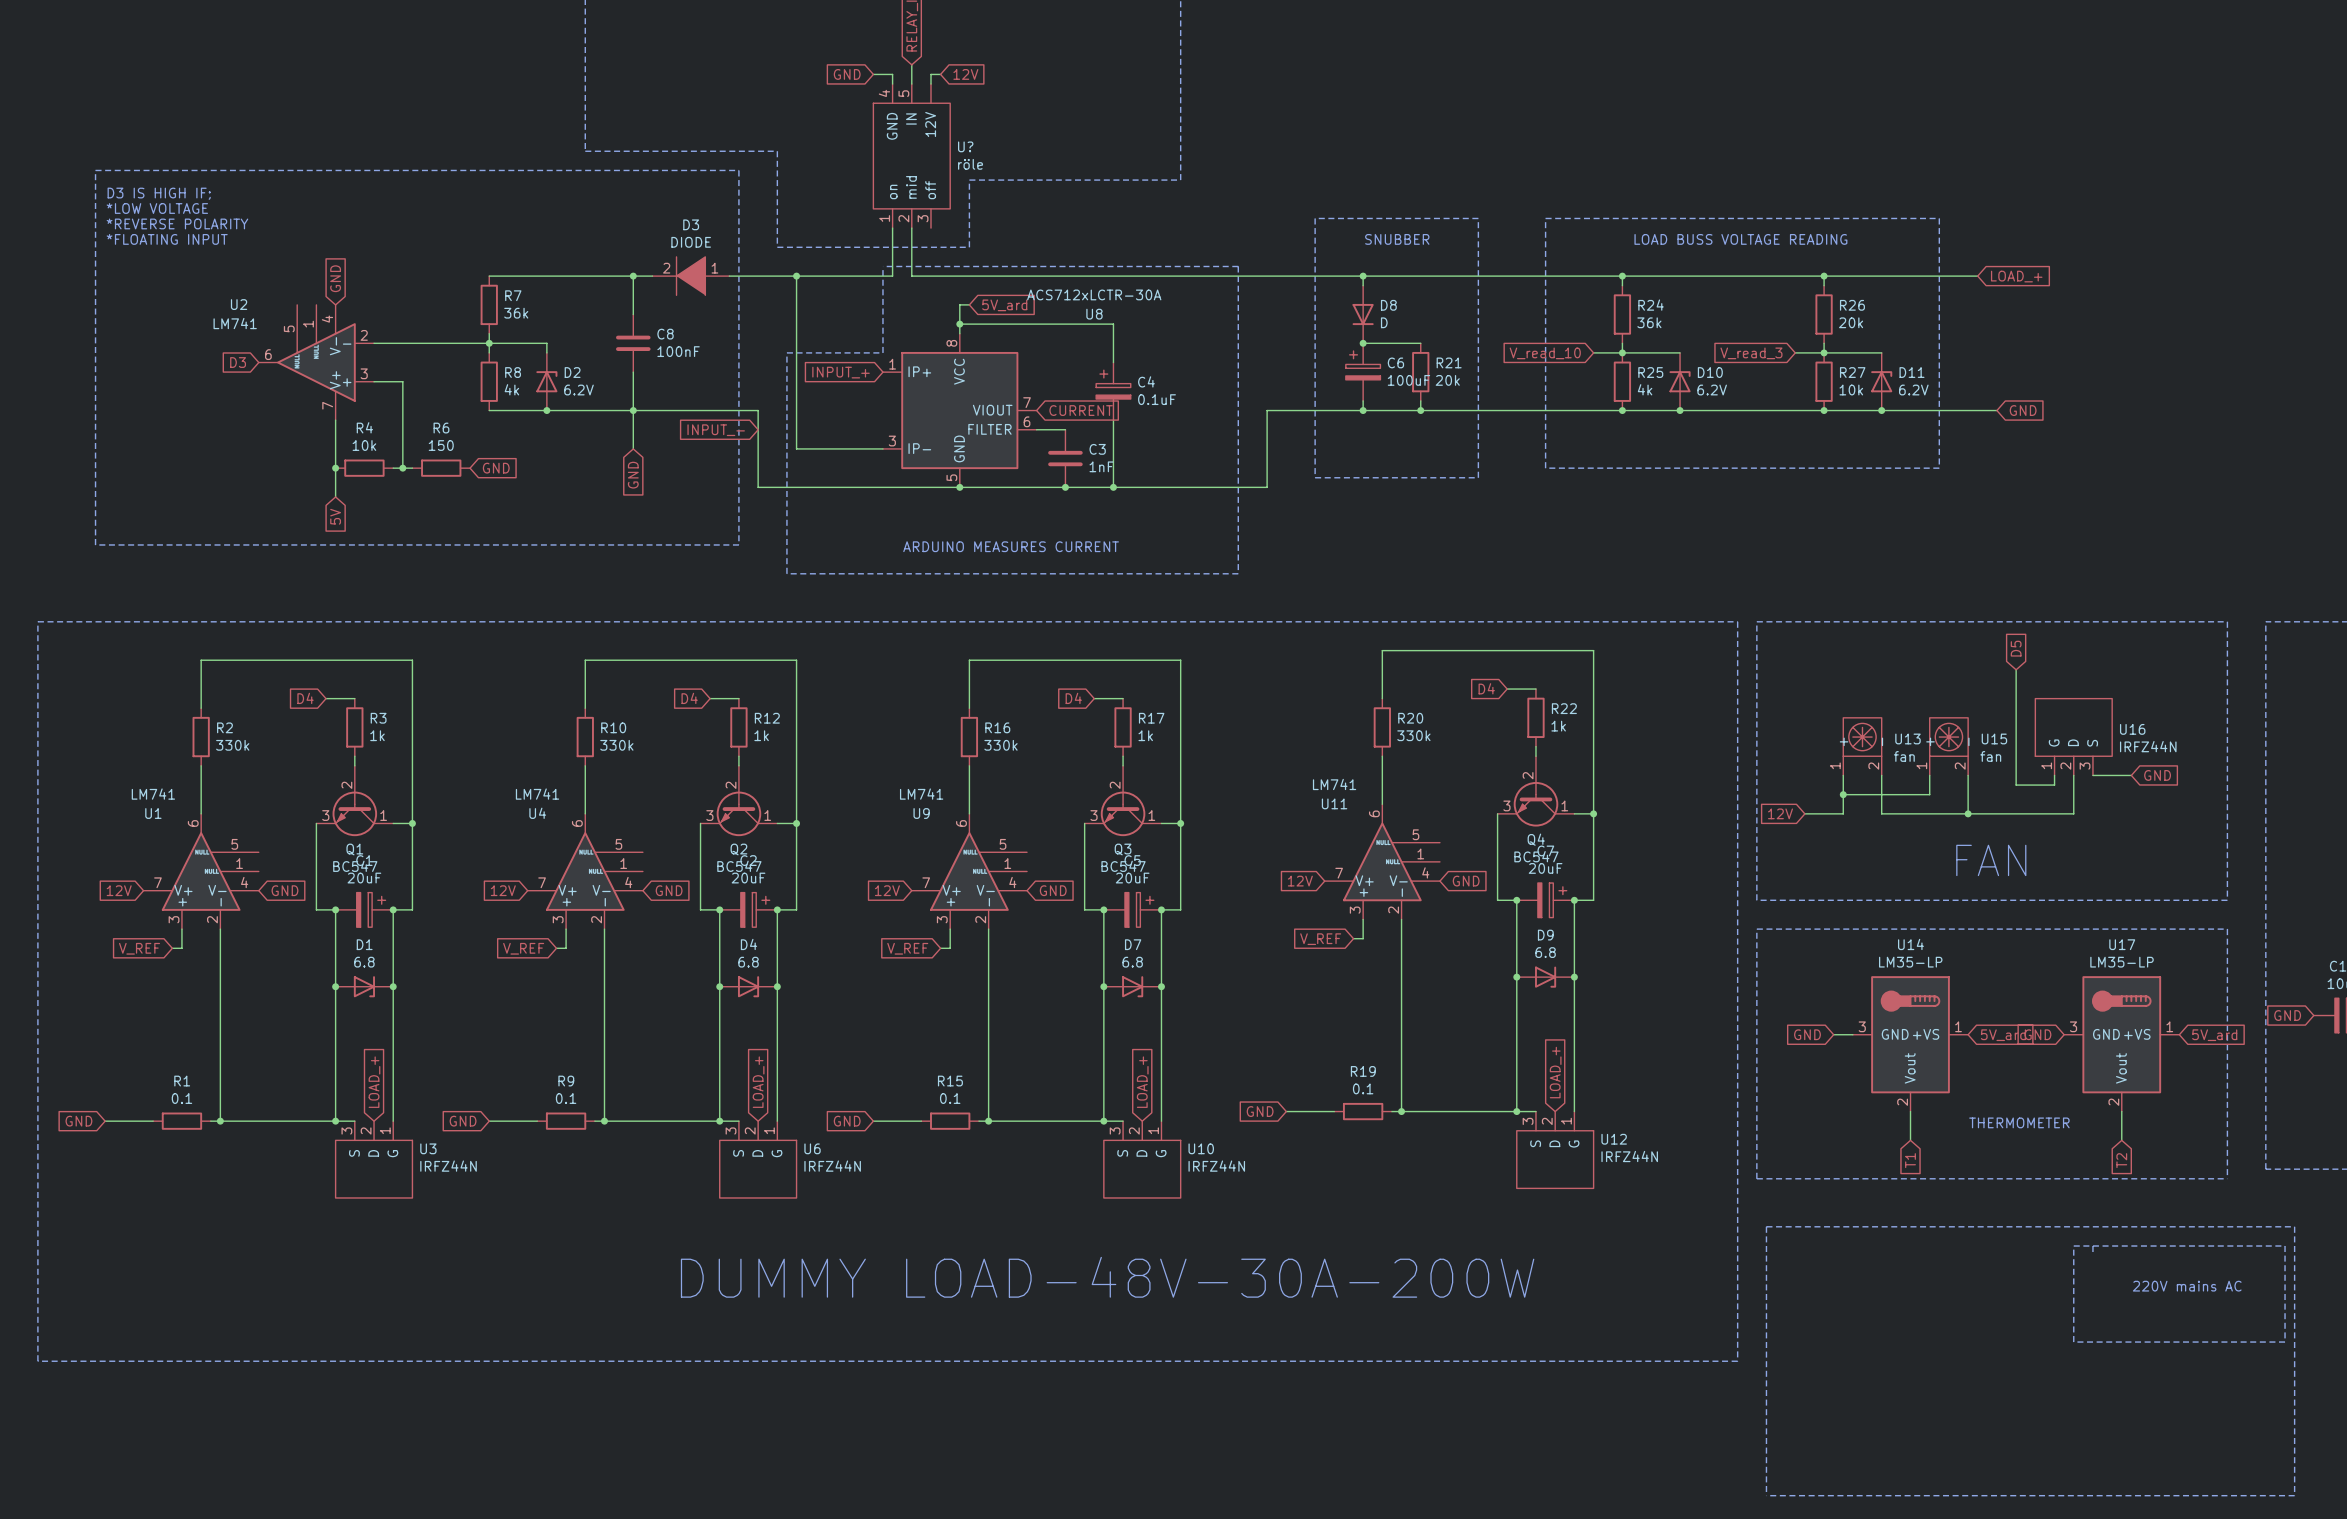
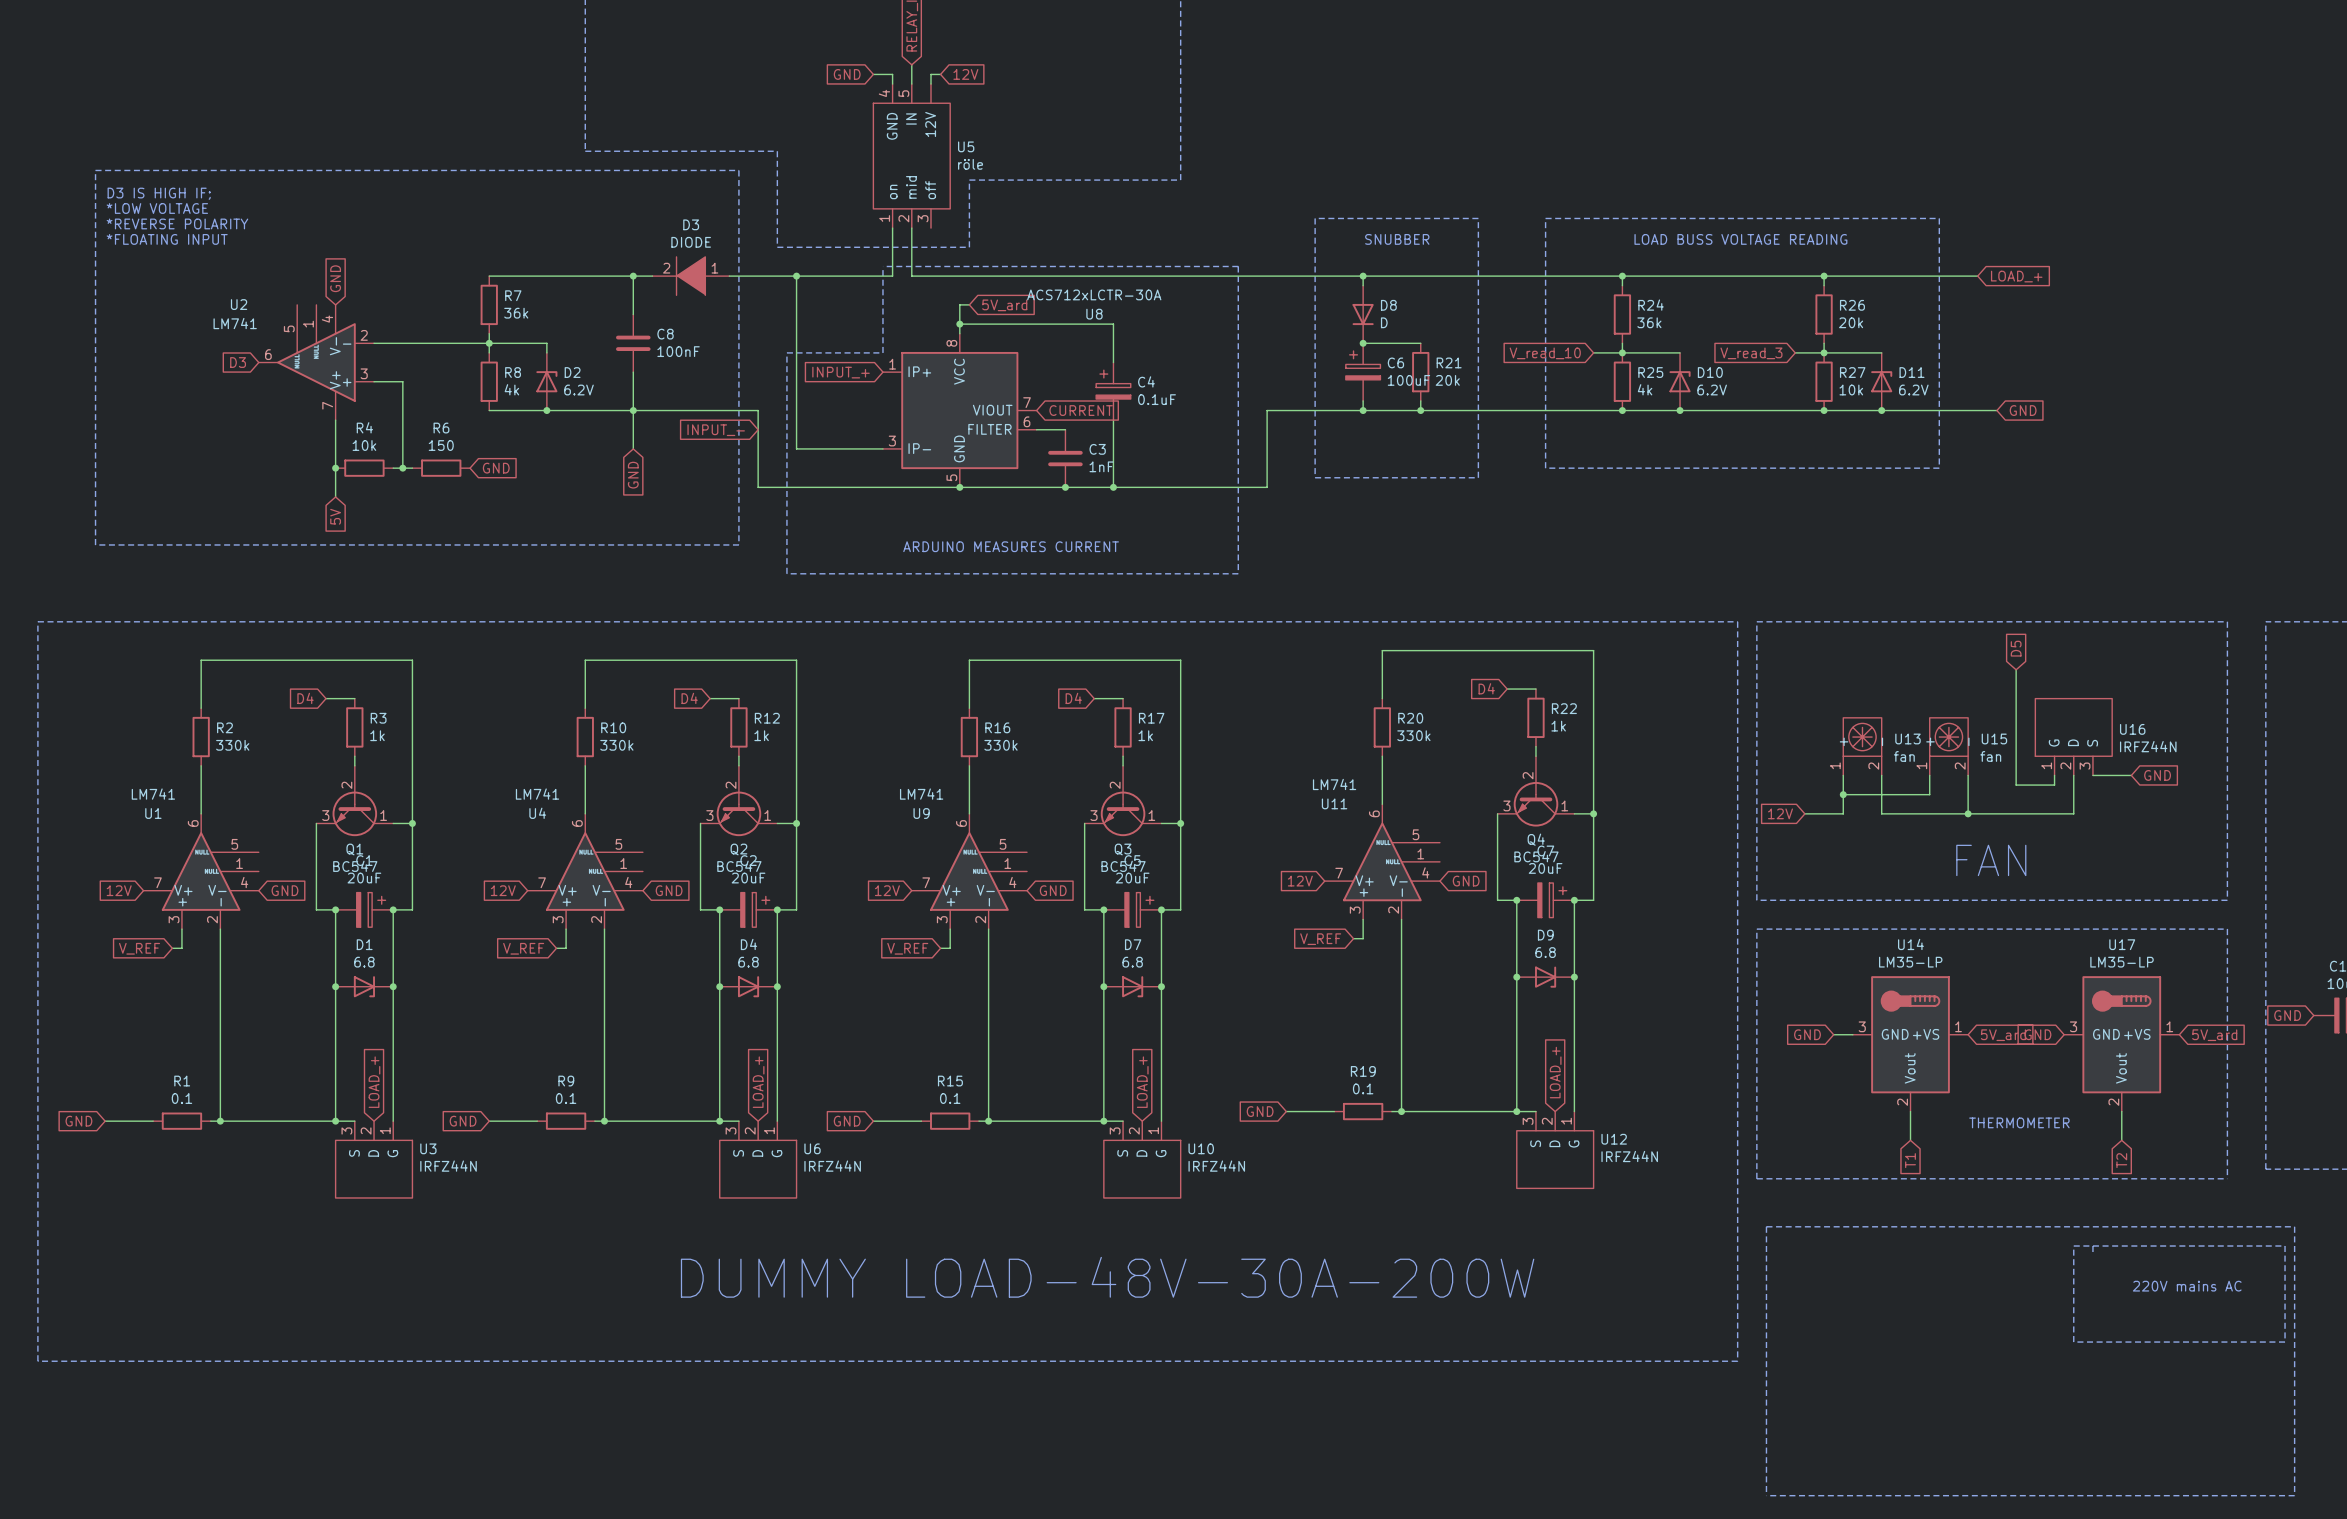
U? name: U? (965, 146) -> U5 (966, 146)

